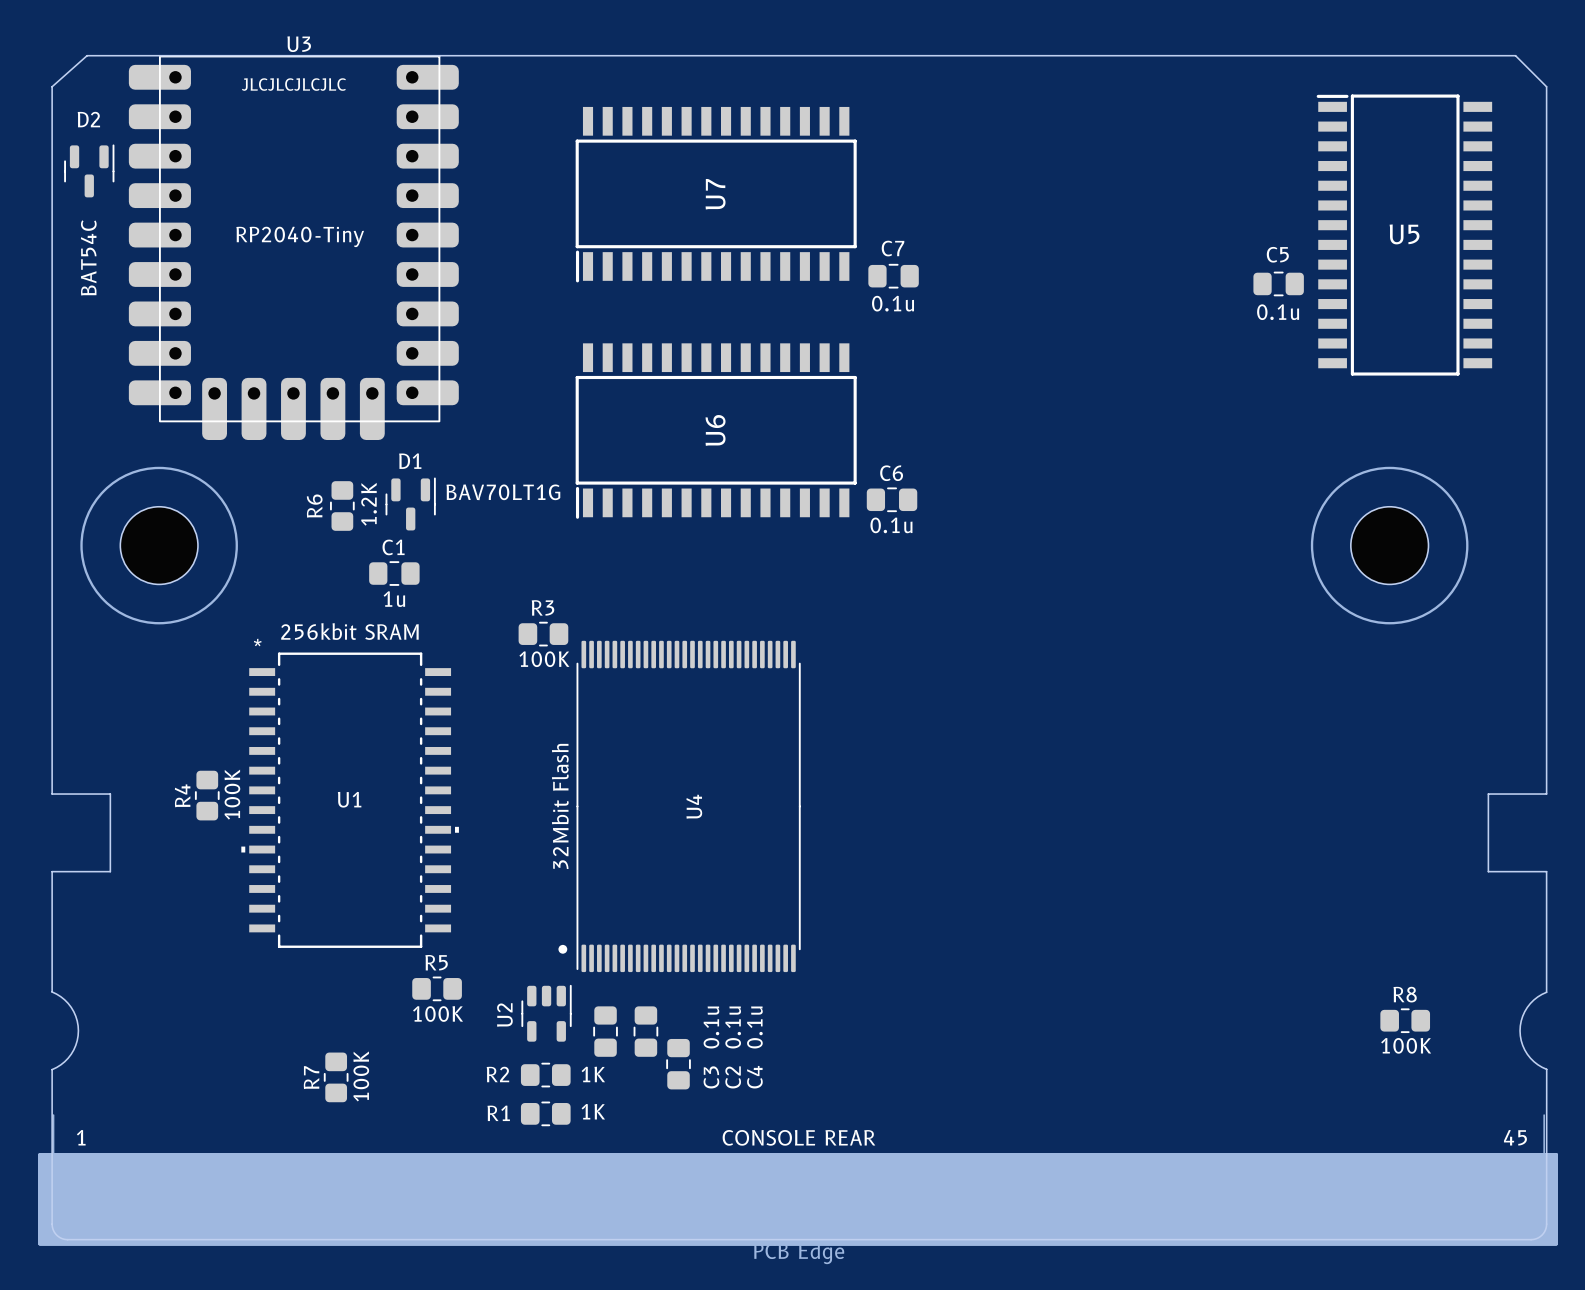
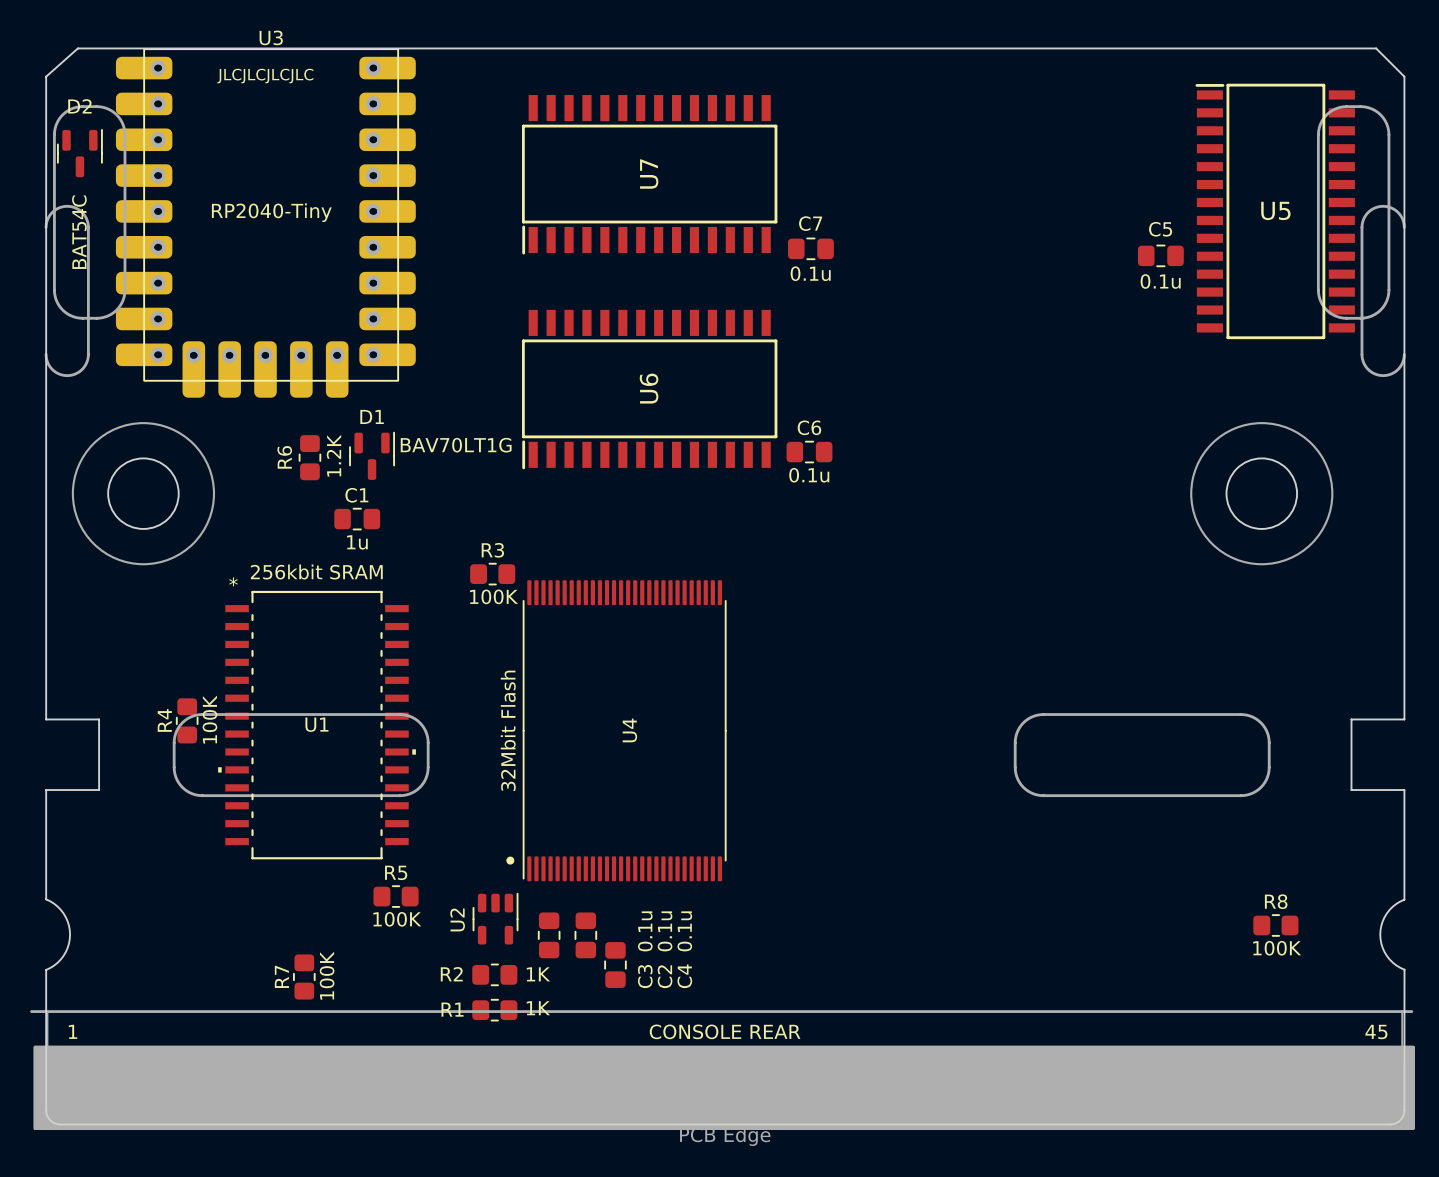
drawing: none -> [151, 60, 166, 76]
drawing: none -> [366, 60, 381, 76]
drawing: none -> [151, 96, 166, 112]
drawing: none -> [366, 96, 381, 112]
line: none -> (82, 106) (99, 106) (111, 110) (120, 119) (124, 131) (124, 293) (122, 302) (116, 310) (109, 315) (99, 318) (79, 318) (70, 315) (60, 307) (54, 293) (54, 131) (58, 119) (65, 112) (73, 108) (82, 106)
line: none -> (1346, 106) (1364, 106) (1374, 110) (1385, 120) (1388, 131) (1388, 293) (1380, 310) (1364, 318) (1343, 318) (1334, 315) (1324, 307) (1318, 293) (1318, 131) (1326, 114) (1335, 108) (1346, 106)
drawing: none -> [151, 131, 166, 148]
drawing: none -> [366, 131, 381, 148]
drawing: none -> [151, 167, 166, 184]
drawing: none -> [366, 167, 381, 184]
drawing: none -> [151, 203, 166, 220]
drawing: none -> [366, 203, 381, 220]
line: none -> (46, 227) (51, 213) (59, 207) (67, 206) (74, 207) (83, 213) (88, 227) (87, 361) (79, 371) (64, 375) (51, 368) (46, 354)
line: none -> (1404, 227) (1401, 217) (1397, 211) (1383, 206) (1373, 208) (1367, 213) (1361, 227) (1363, 361) (1373, 373) (1388, 375) (1398, 368) (1404, 354)
drawing: none -> [151, 239, 166, 256]
drawing: none -> [366, 239, 381, 256]
drawing: none -> [151, 275, 166, 291]
drawing: none -> [366, 275, 381, 291]
drawing: none -> [151, 311, 166, 327]
drawing: none -> [366, 311, 381, 327]
drawing: none -> [151, 347, 166, 363]
drawing: none -> [186, 347, 201, 364]
drawing: none -> [222, 347, 237, 364]
drawing: none -> [258, 347, 273, 364]
drawing: none -> [294, 347, 309, 364]
drawing: none -> [330, 347, 345, 364]
drawing: none -> [366, 347, 381, 363]
line: none -> (202, 714) (406, 715) (417, 720) (426, 733) (427, 773) (419, 787) (412, 792) (403, 795) (196, 794) (184, 789) (175, 776) (174, 739) (178, 727) (184, 720) (193, 716) (202, 714)
line: none -> (1043, 714) (1247, 715) (1258, 720) (1267, 733) (1268, 773) (1264, 782) (1258, 789) (1244, 795) (1037, 794) (1025, 789) (1016, 776) (1015, 739) (1018, 730) (1025, 720) (1034, 716) (1043, 714)
line: none -> (31, 1011) (1411, 1011)

